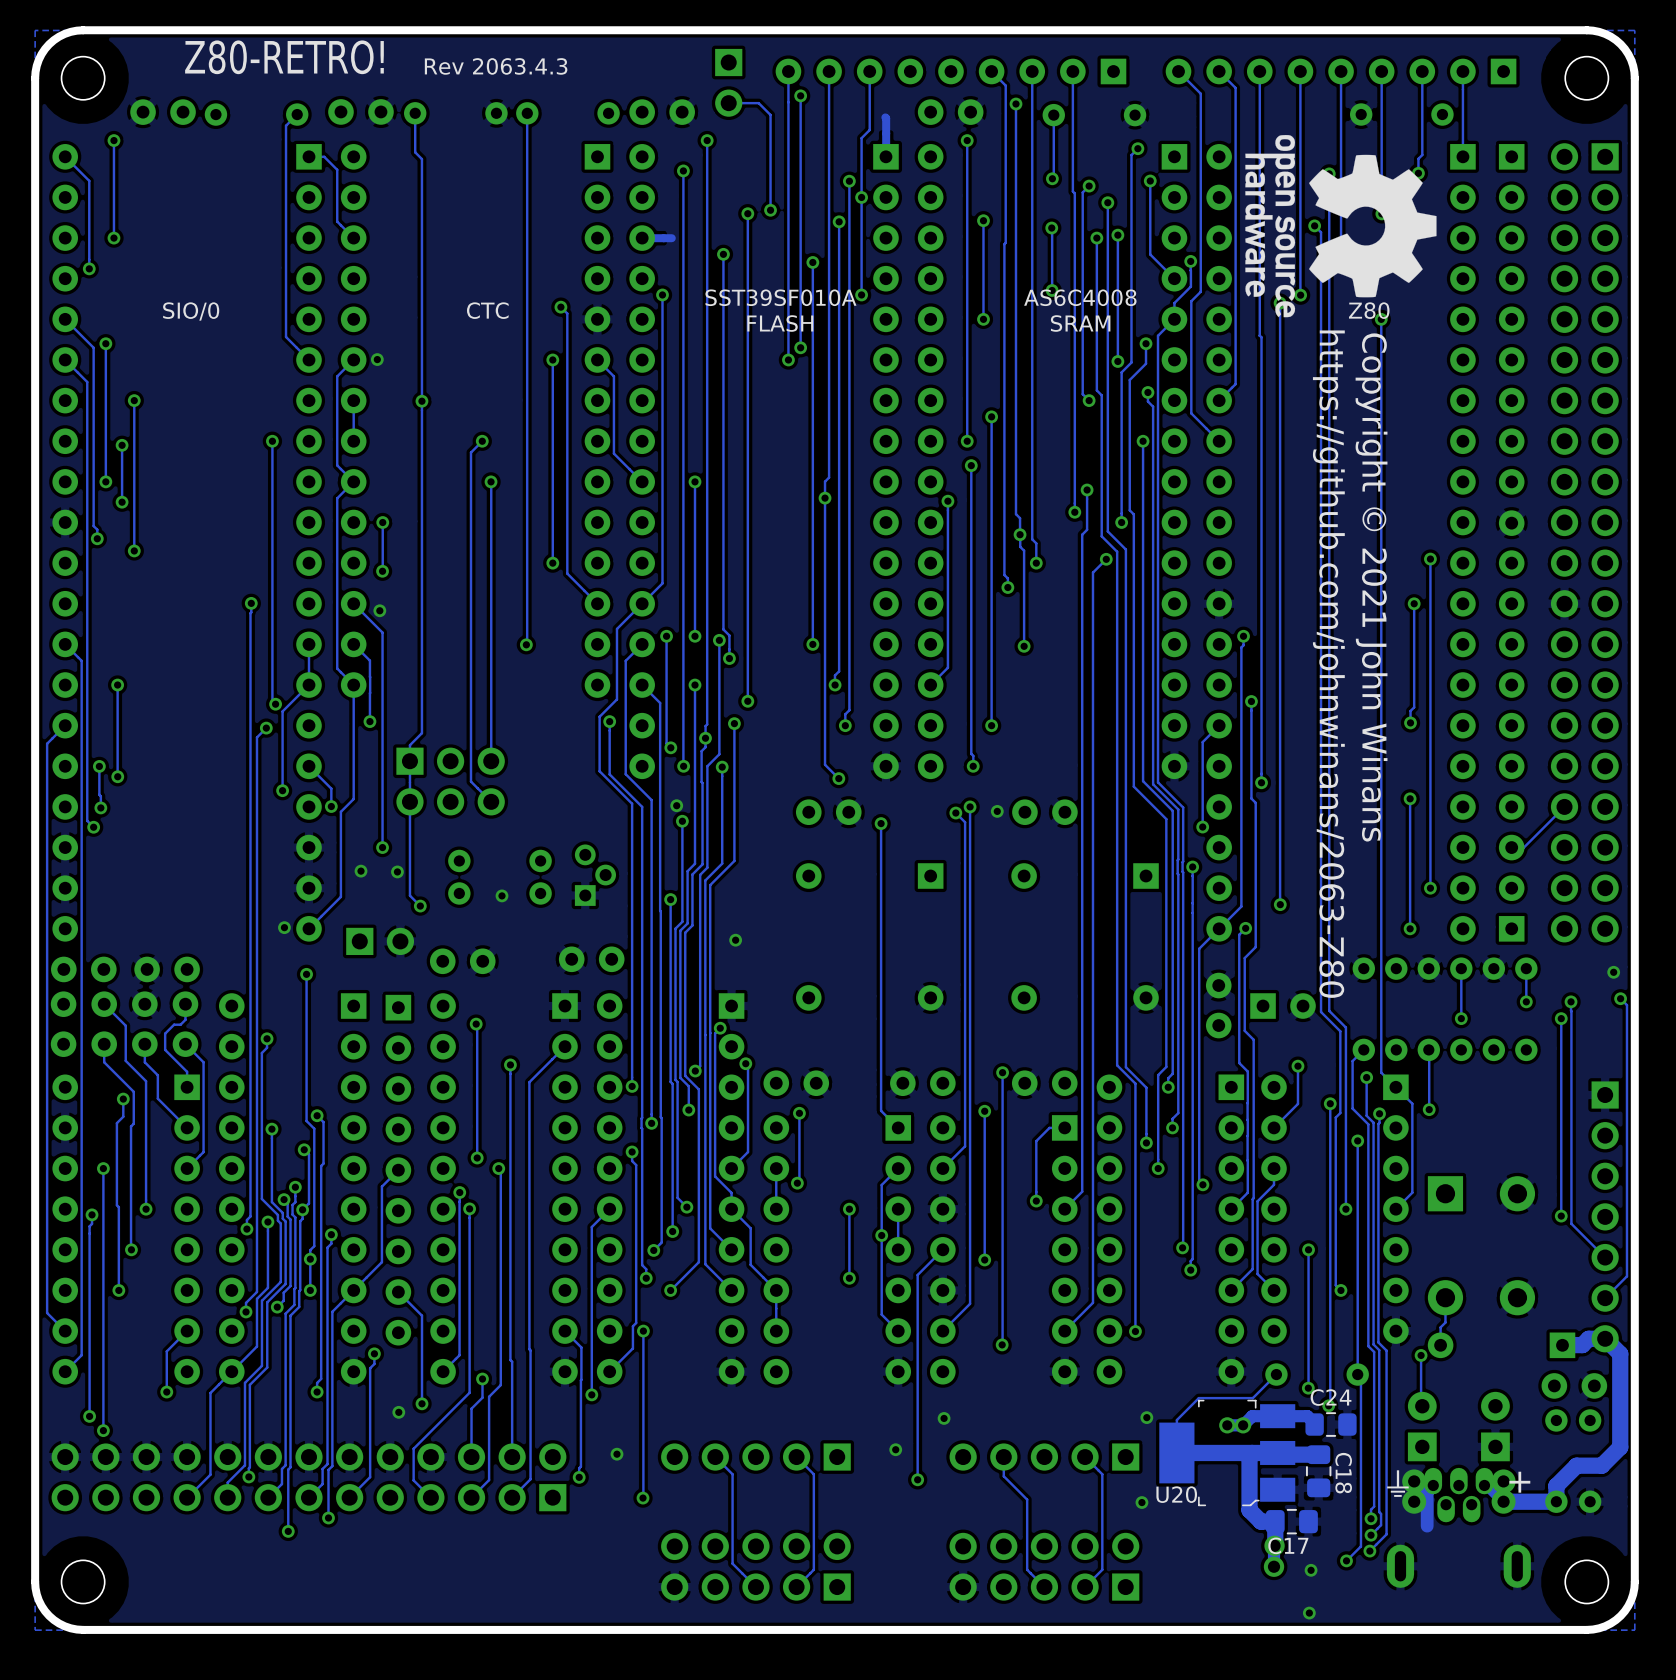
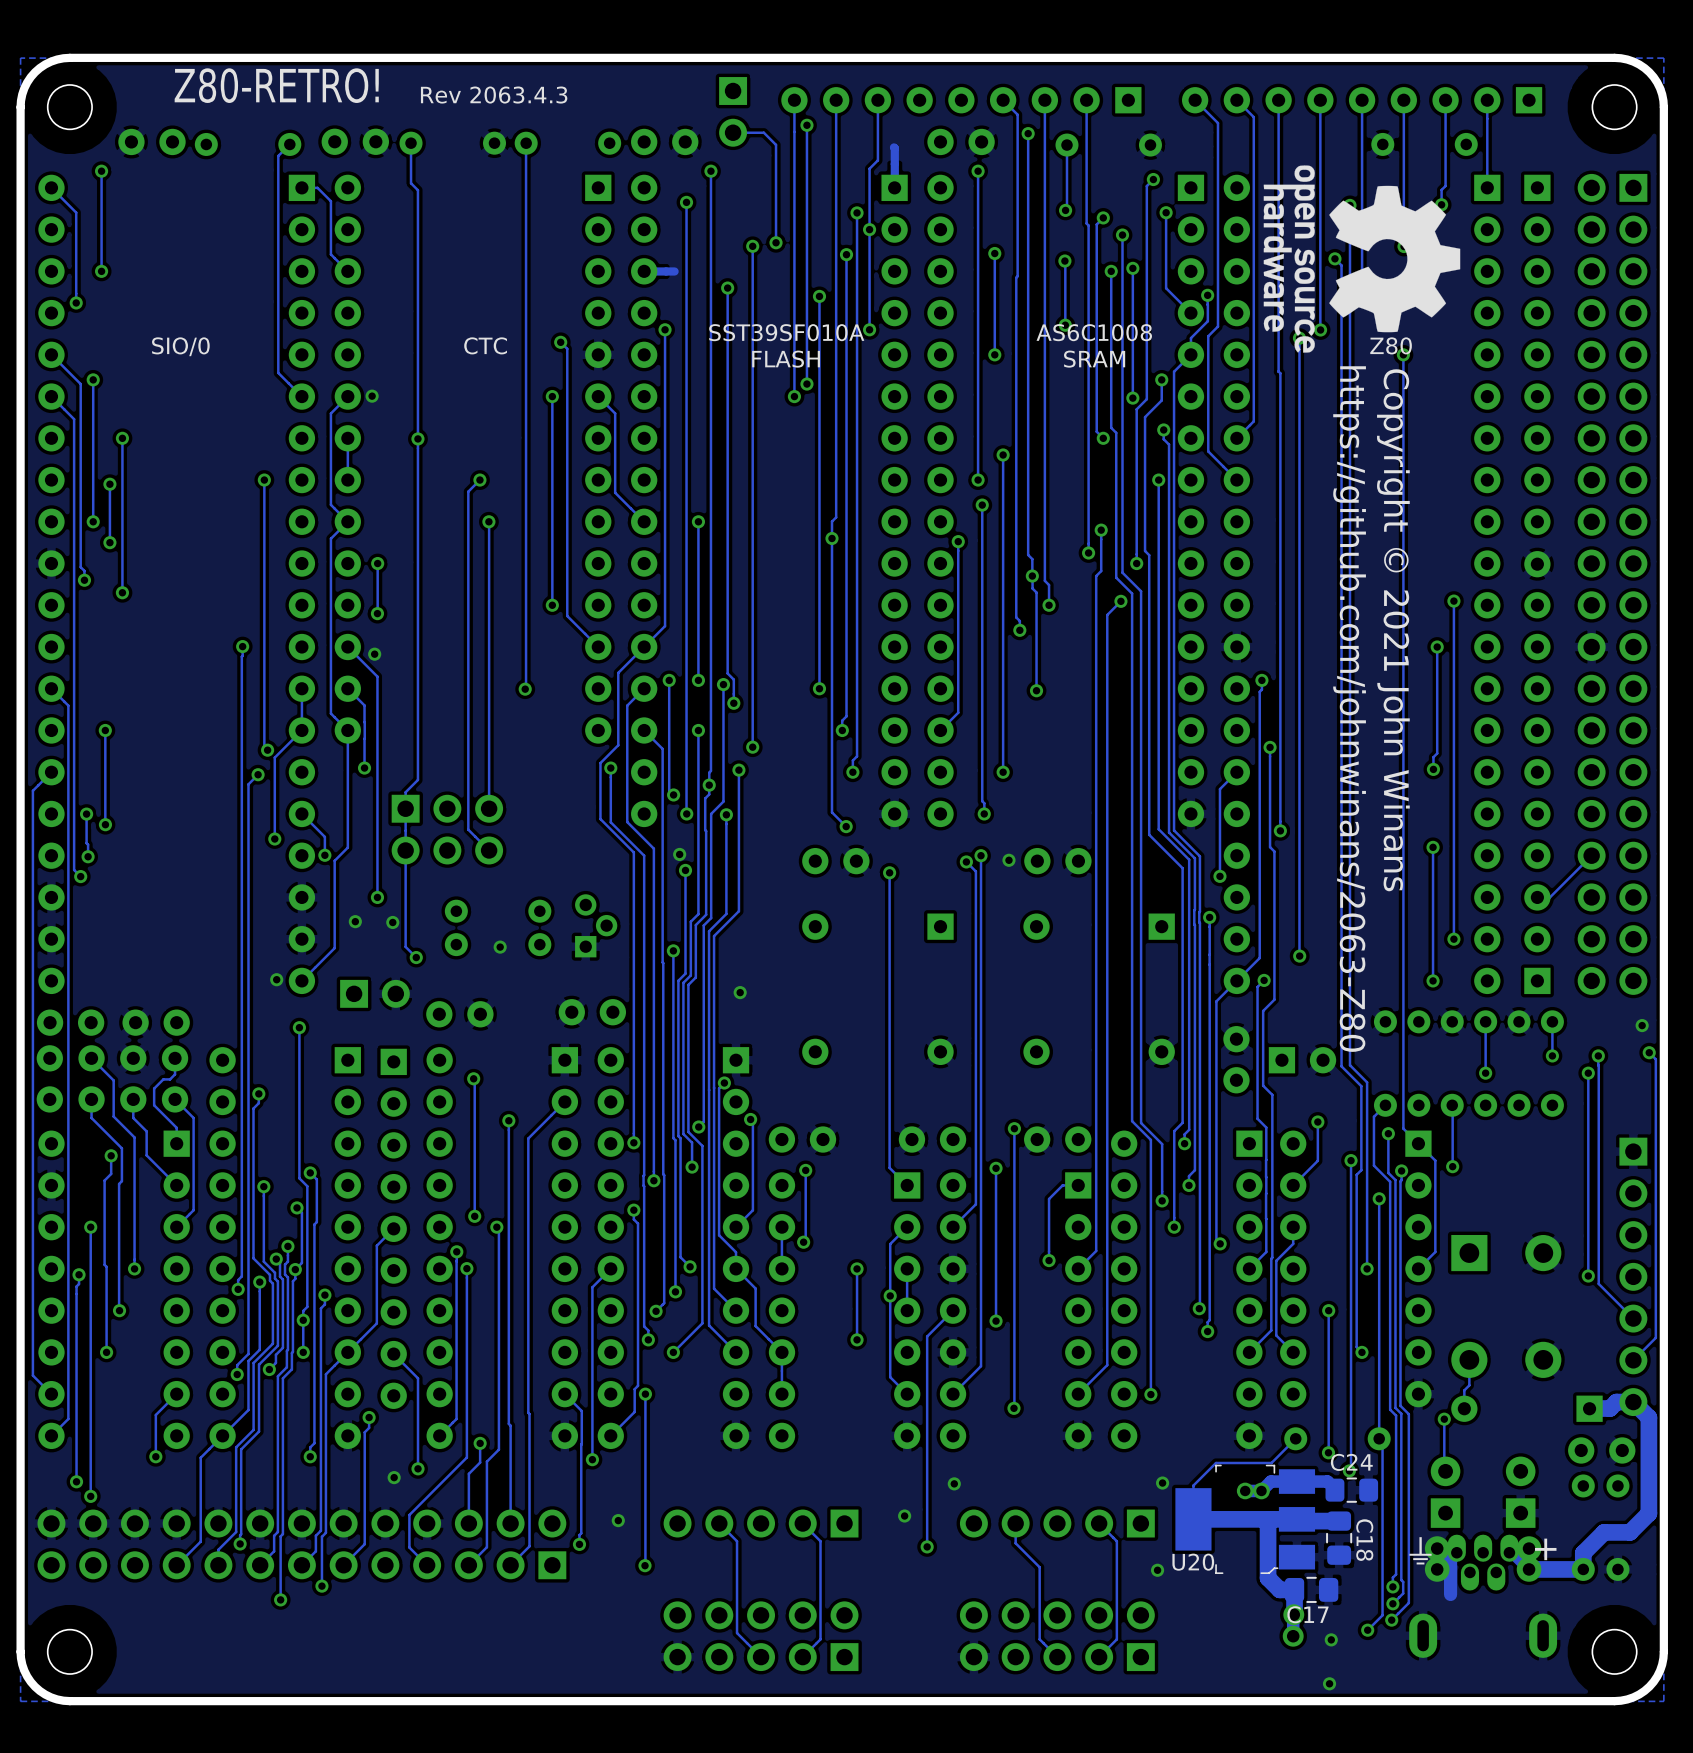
text: AS6C4008 (1080, 297) -> AS6C1008 (1094, 332)

